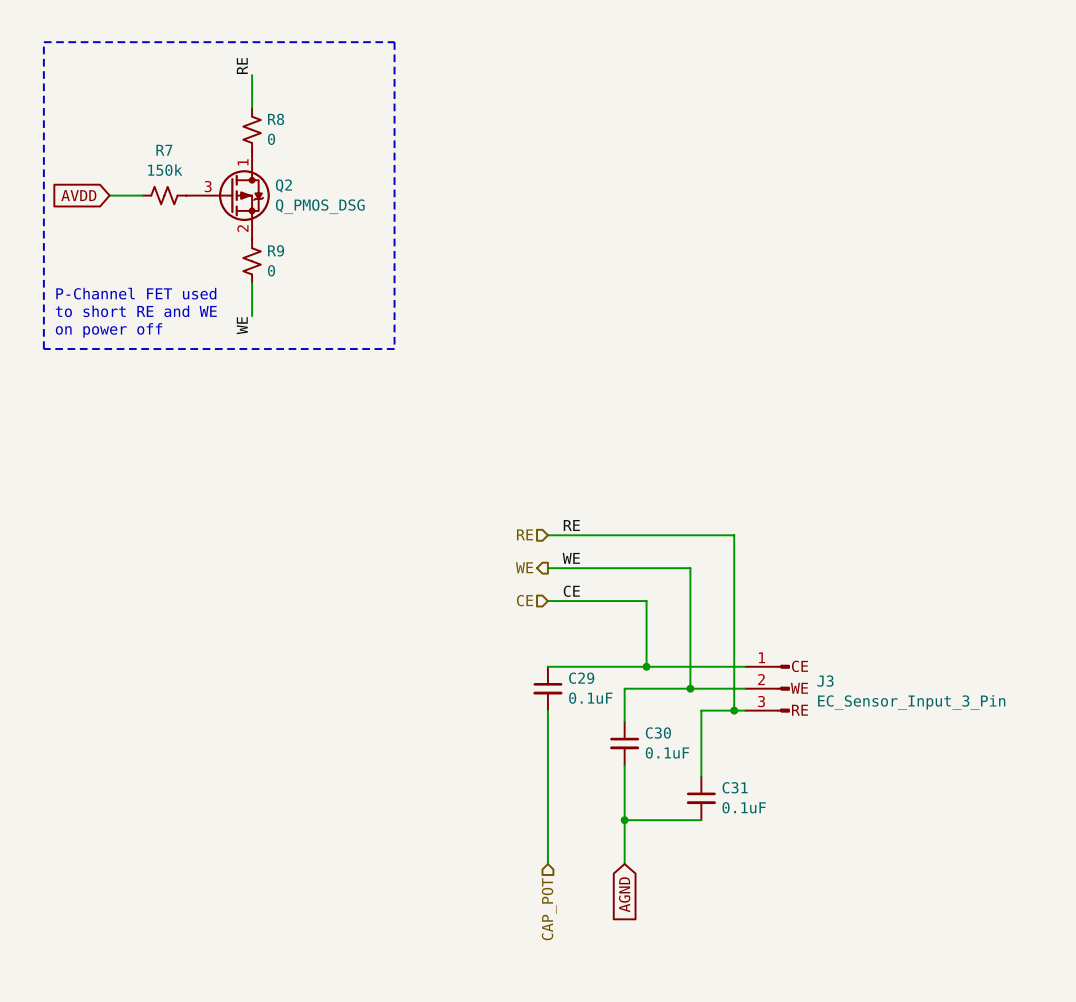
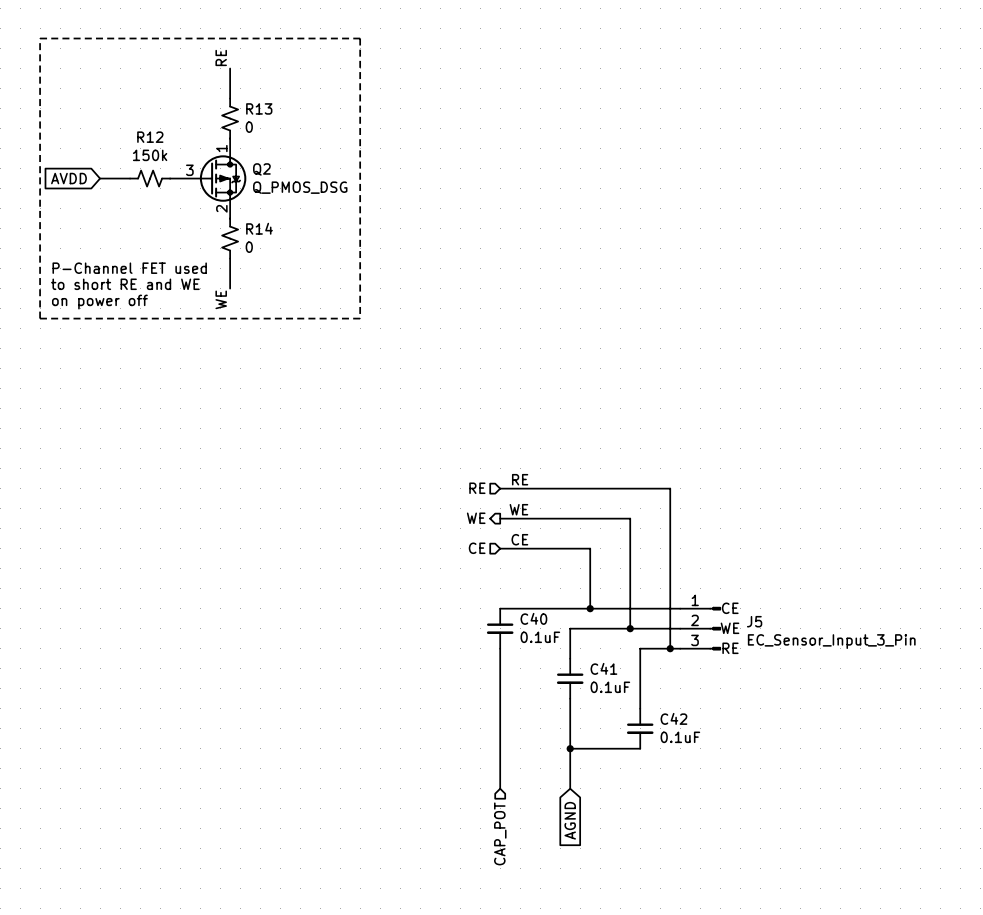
R8 name: R8 (276, 119) -> R13 (259, 108)
R7 name: R7 (164, 150) -> R12 (150, 137)
R9 name: R9 (276, 250) -> R14 (259, 228)
C29 name: C29 (581, 678) -> C40 (533, 618)
J3 name: J3 (825, 681) -> J5 (754, 621)
C30 name: C30 (658, 733) -> C41 (603, 668)
C31 name: C31 (735, 787) -> C42 (673, 718)

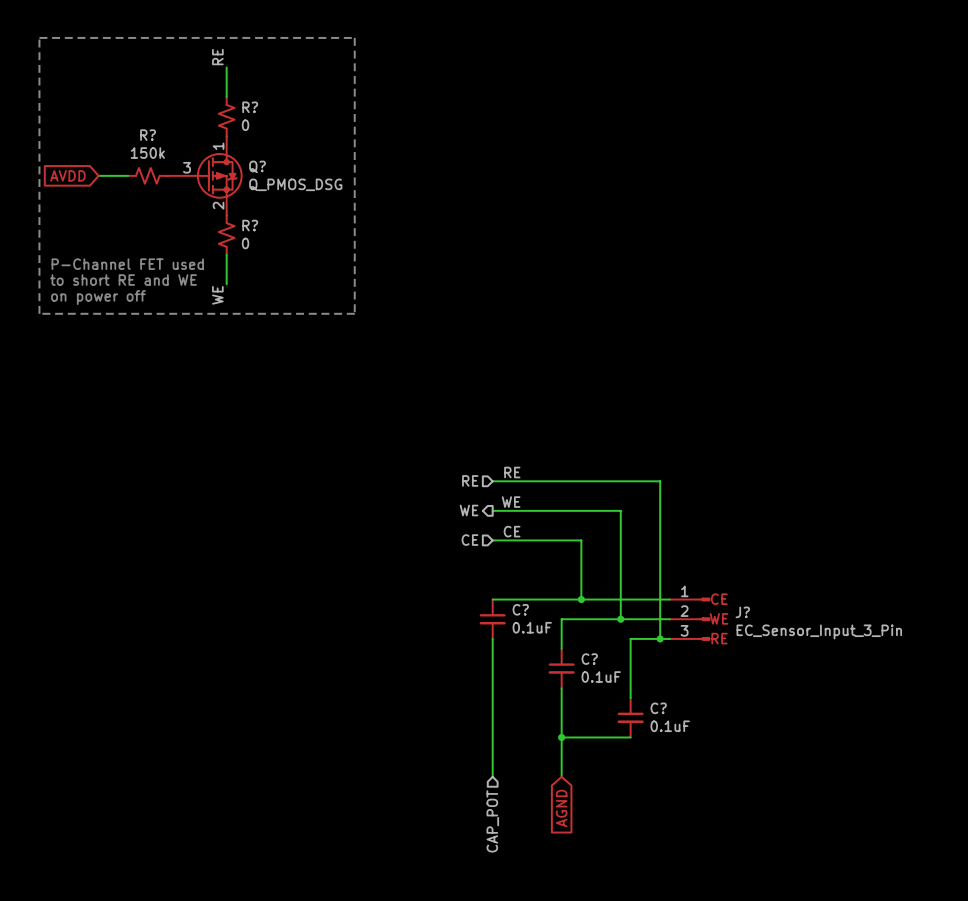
R13 name: R13 (259, 108) -> R? (250, 107)
R12 name: R12 (150, 137) -> R? (148, 135)
Q2 name: Q2 (261, 169) -> Q? (257, 166)
R14 name: R14 (259, 228) -> R? (250, 225)
C40 name: C40 (533, 618) -> C? (520, 609)
J5 name: J5 (754, 621) -> J? (742, 612)
C41 name: C41 (603, 668) -> C? (589, 659)
C42 name: C42 (673, 718) -> C? (658, 708)

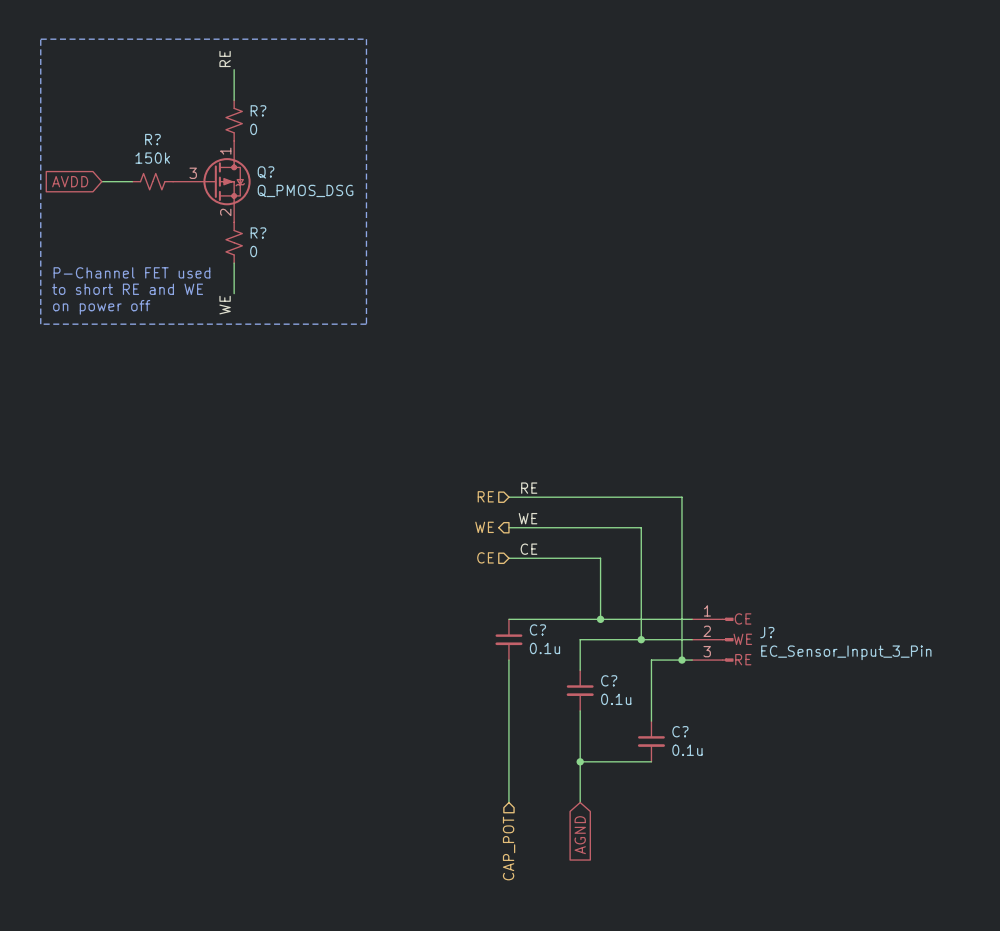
C? value: 0.1uF (532, 627) -> 0.1u (544, 648)
C? value: 0.1uF (601, 677) -> 0.1u (616, 699)
C? value: 0.1uF (670, 726) -> 0.1u (687, 750)

